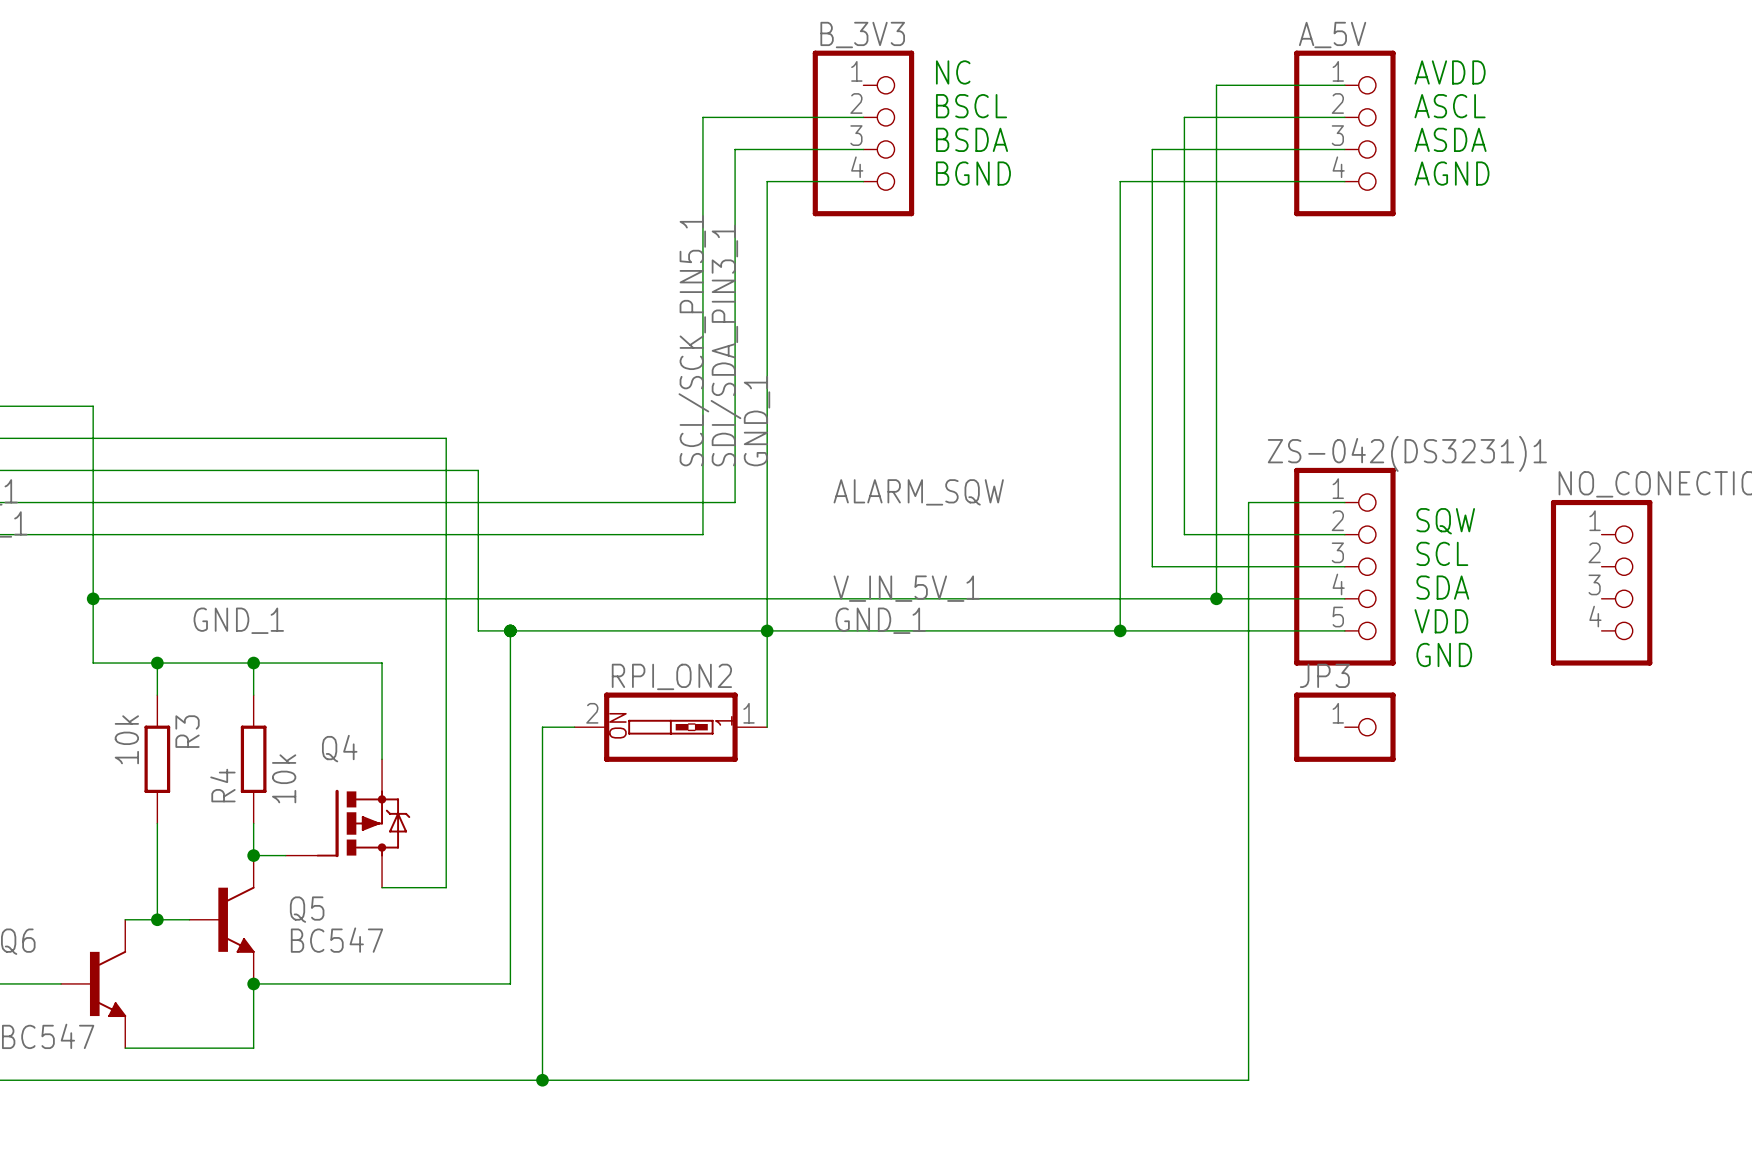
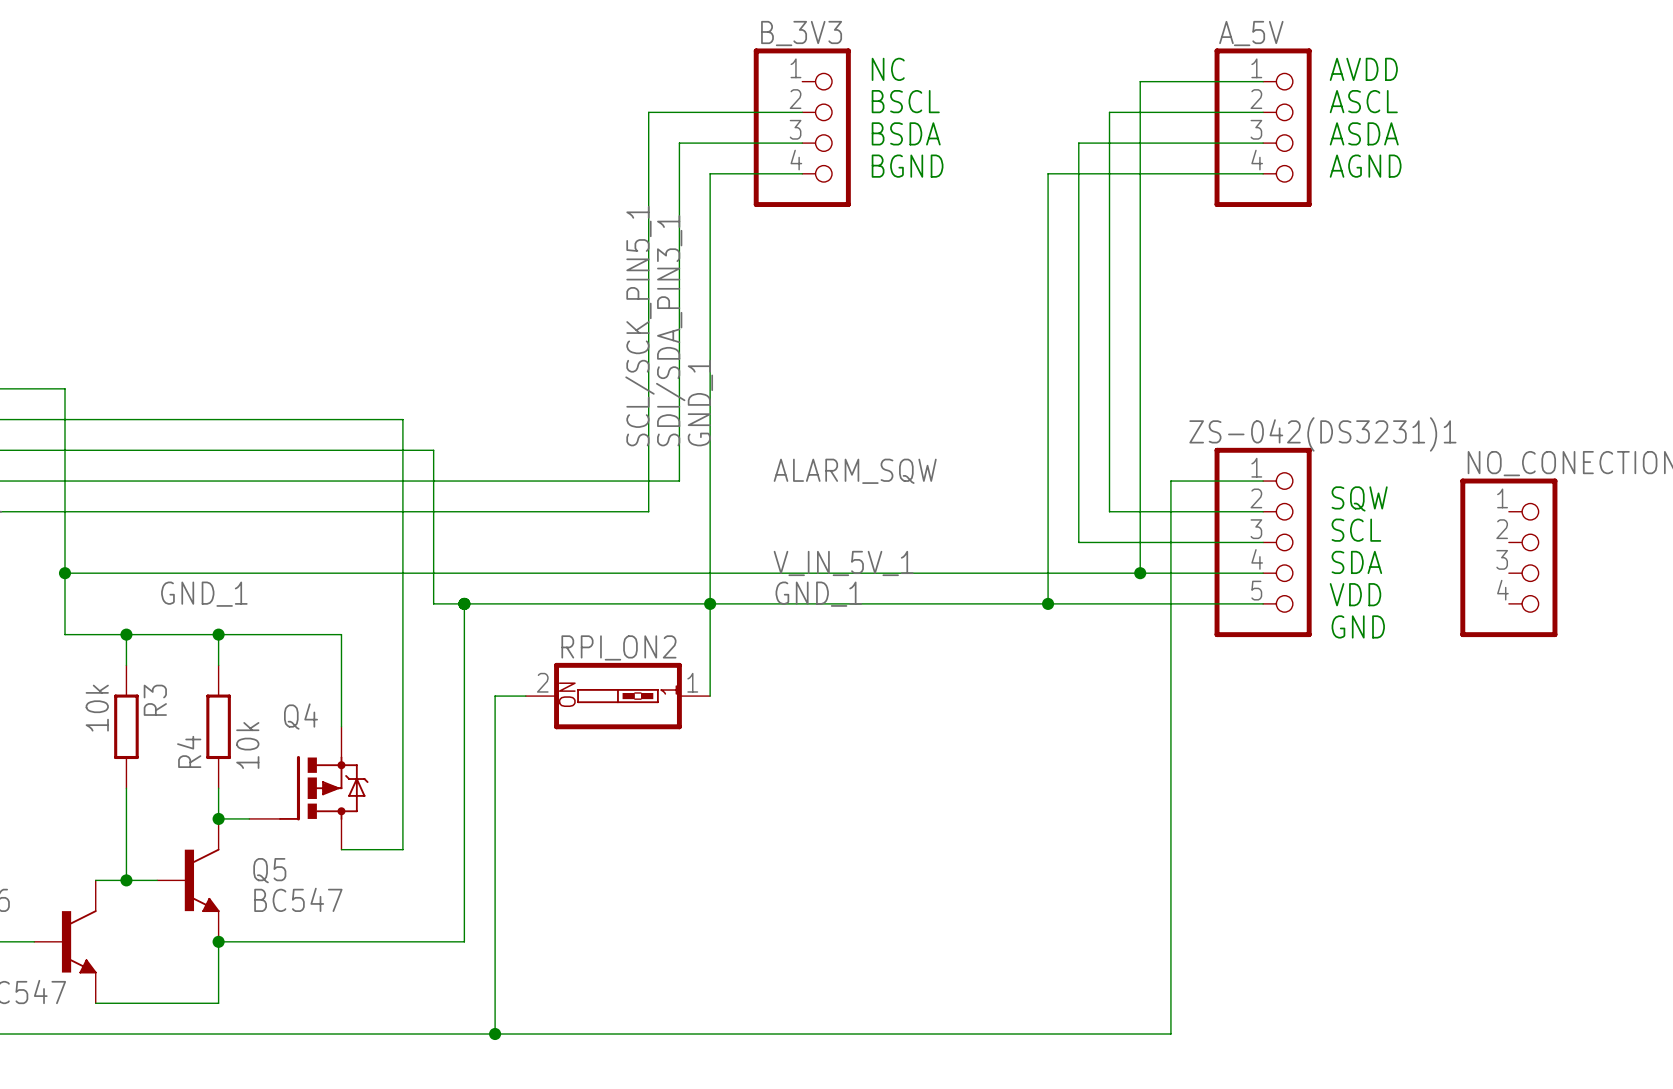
JP3: (1344, 727) -> none

